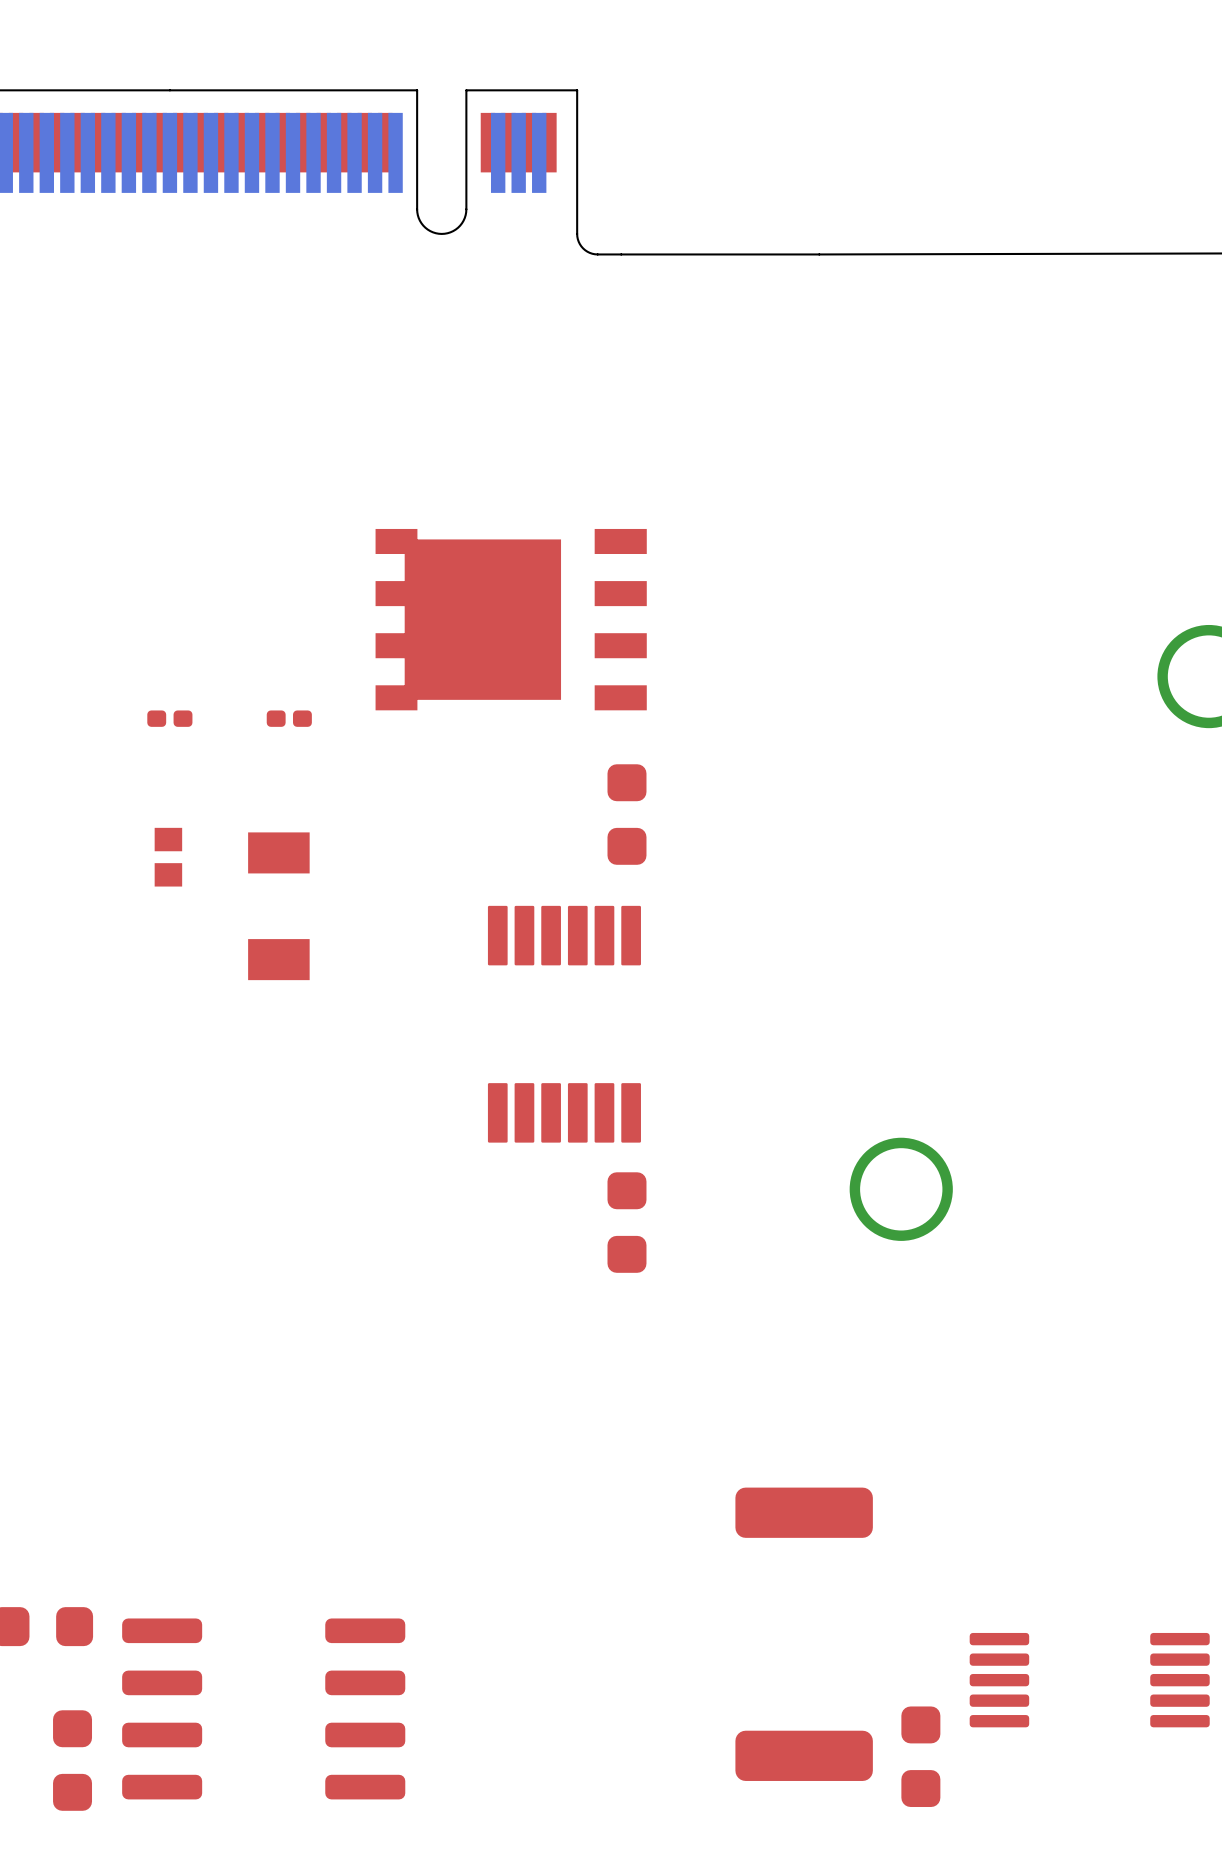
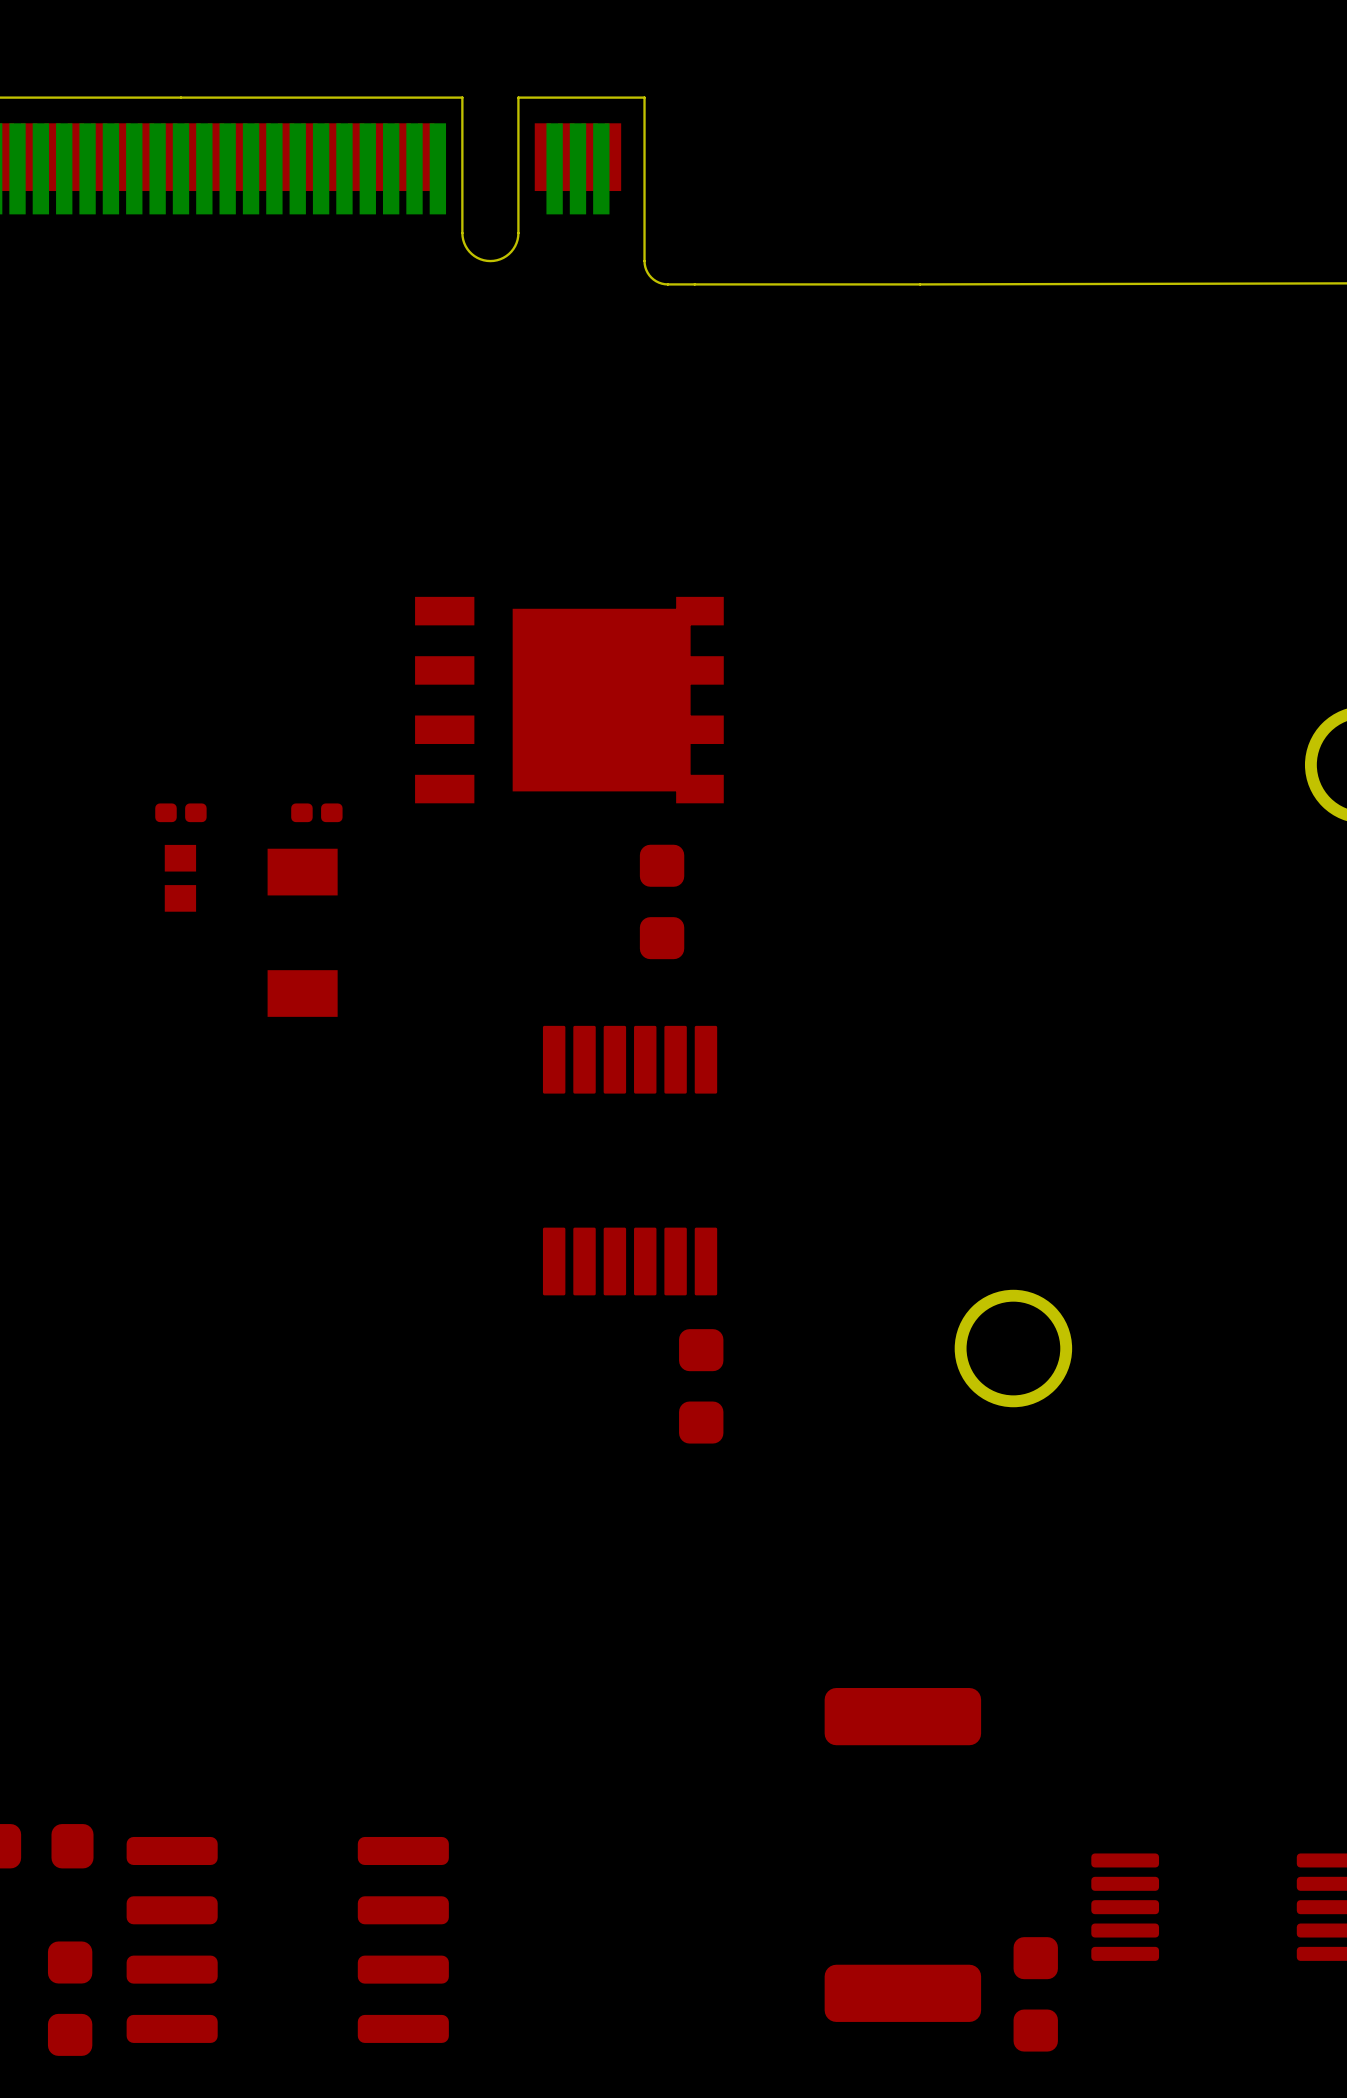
part rotation: 0° (511, 619) -> 180° (569, 700)
part position: (626, 814) -> (662, 901)
part position: (168, 857) -> (180, 878)
part position: (278, 906) -> (302, 932)

